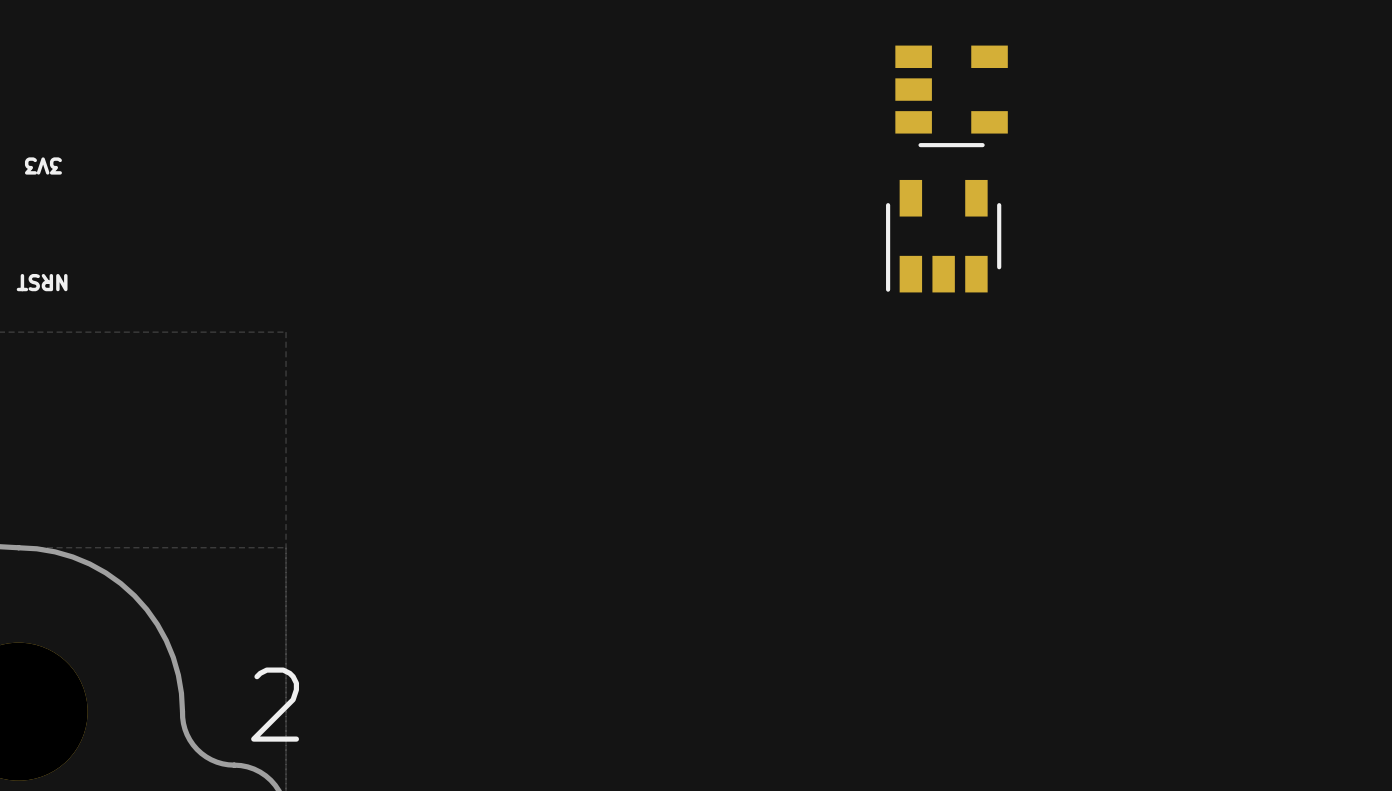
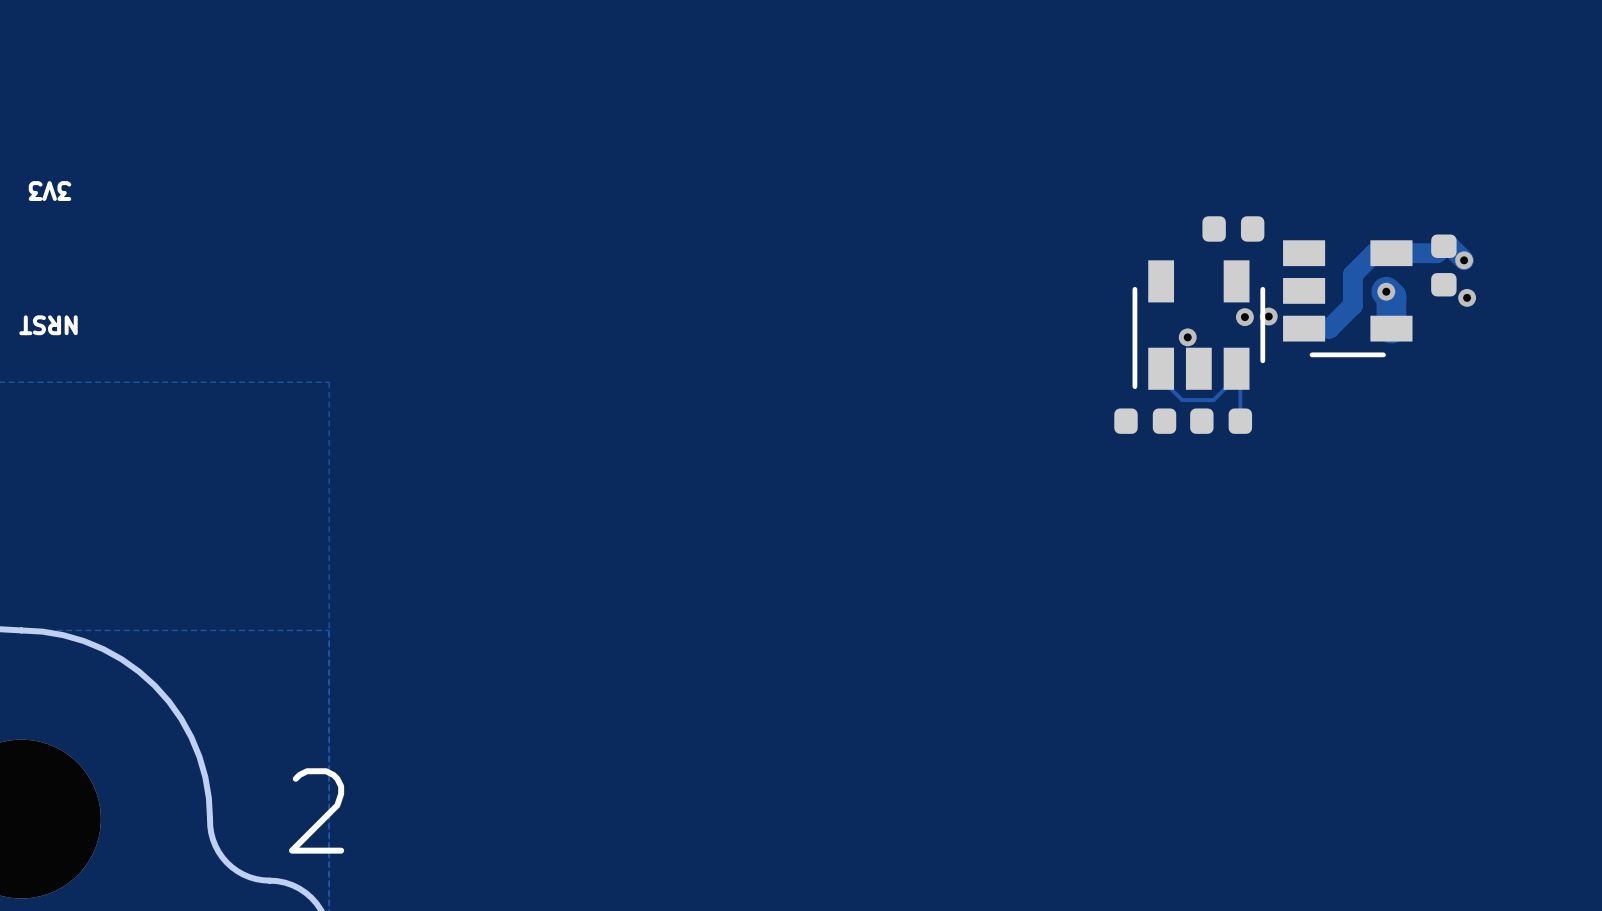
part position: (951, 96) -> (1347, 298)
part: none -> (1233, 228)
track: none -> (1464, 260) (1450, 246) (1443, 246) (1436, 253) (1374, 253) (1352, 274) (1352, 305) (1329, 328) (1304, 328)
via: none -> (1464, 260)
part: none -> (1443, 265)
part position: (943, 236) -> (1198, 325)
track: none -> (1386, 291) (1391, 296) (1391, 328)
via: none -> (1386, 291)
via: none -> (1467, 297)
via: none -> (1244, 317)
via: none -> (1268, 316)
via: none -> (1187, 337)
track: none -> (1161, 368) (1161, 379) (1182, 400) (1213, 400) (1236, 377) (1236, 368) (1240, 372) (1240, 421)
part: none -> (1145, 421)
part: none -> (1221, 421)

